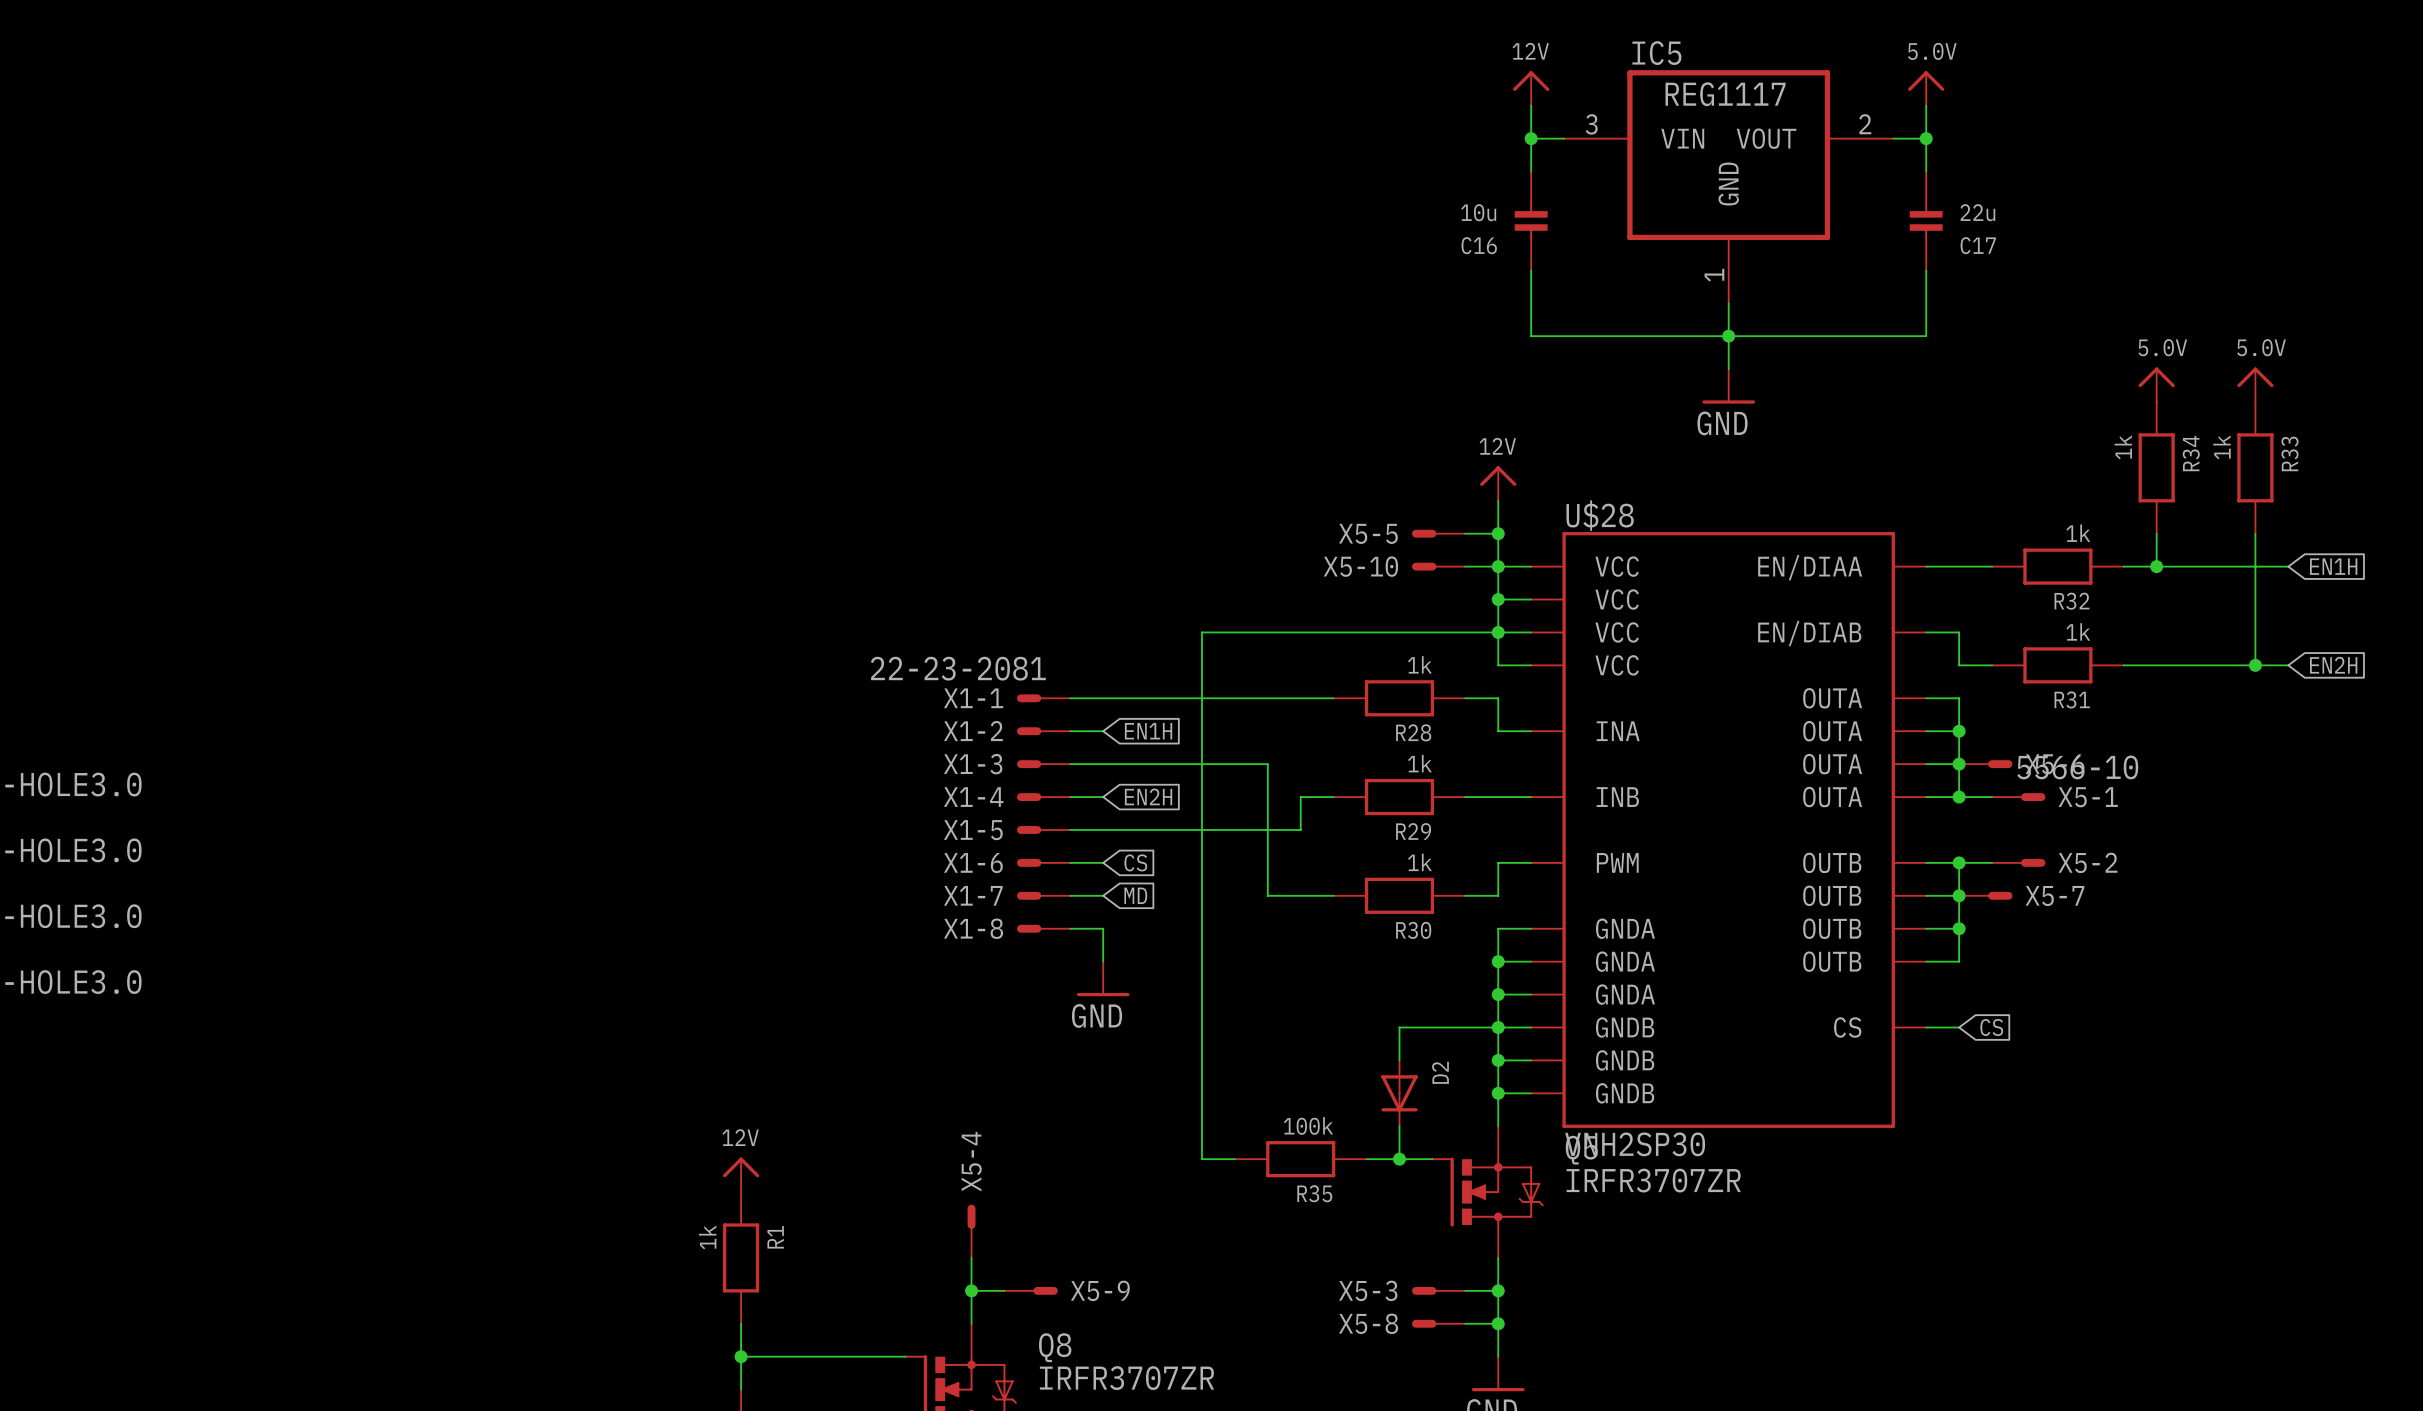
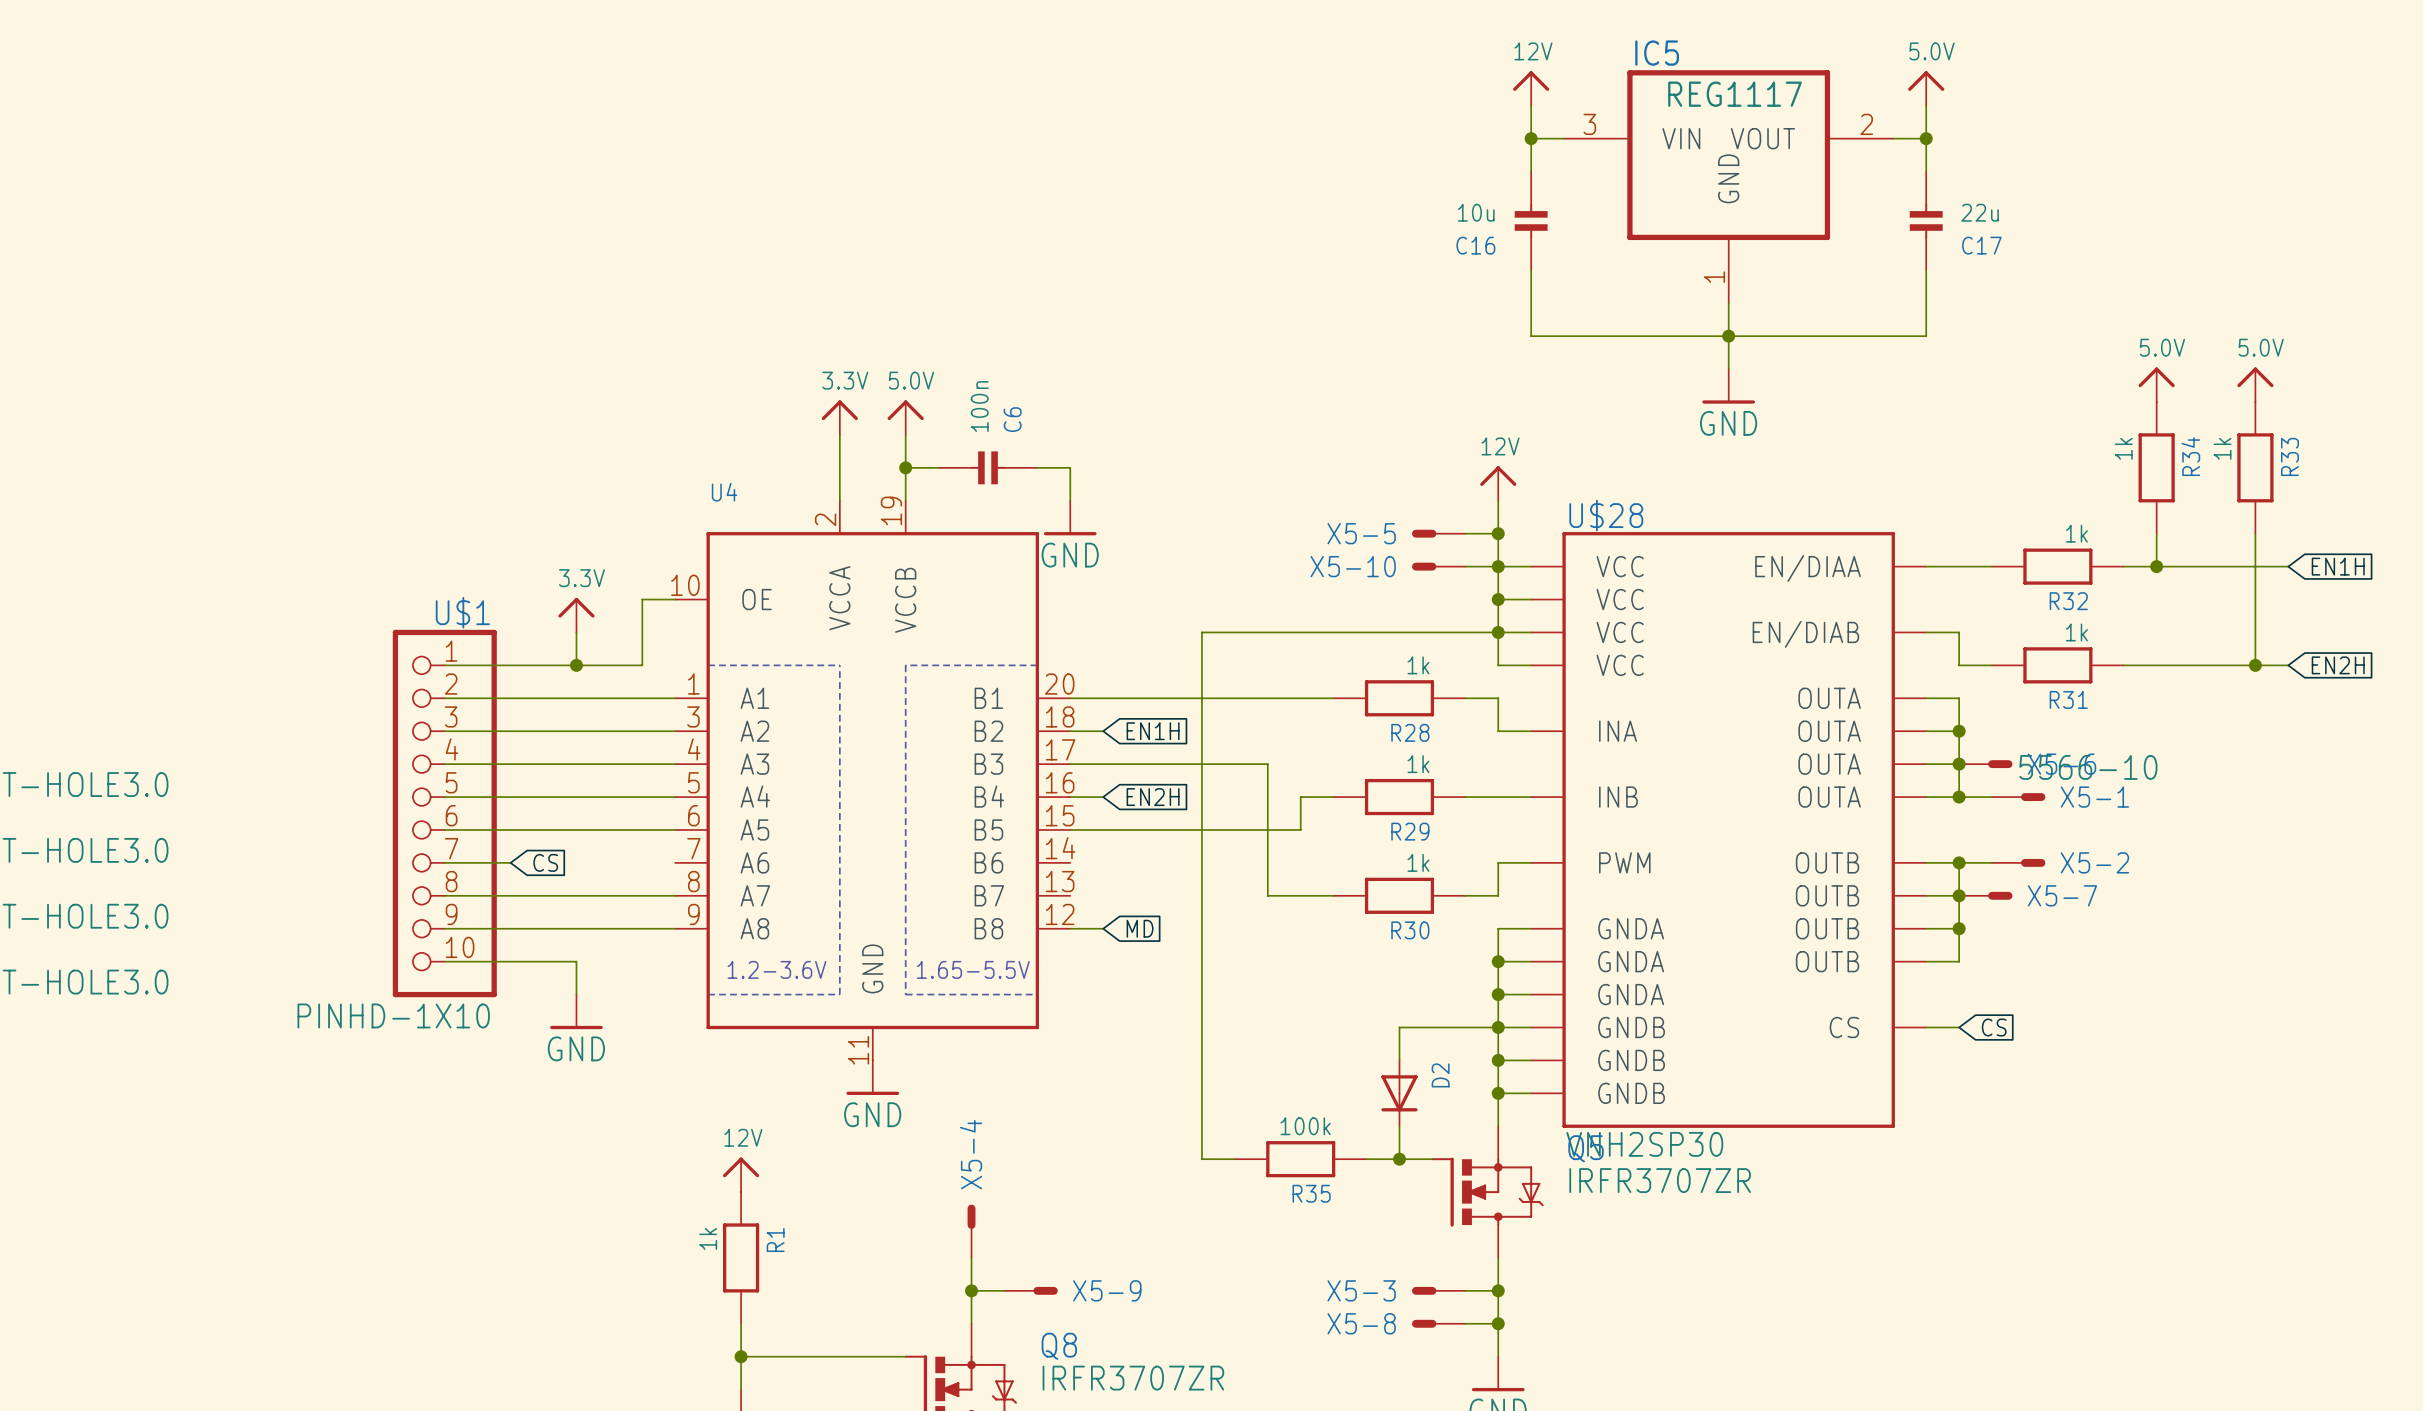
power symbol: none -> 3.3V (839, 417)
power symbol: none -> 5.0V (905, 417)
wire: none -> (839, 434) (839, 500)
wire: none -> (905, 434) (905, 500)
wire: none -> (905, 467) (938, 467)
junction: none -> (905, 467)
C6: none -> 100n (987, 467)
wire: none -> (1037, 467) (1070, 467) (1070, 500)
power symbol: none -> GND (1070, 518)
wire: none -> (675, 599) (642, 599) (642, 665) (444, 665)
power symbol: none -> 3.3V (576, 615)
wire: none -> (576, 632) (576, 665)
junction: none -> (576, 665)
wire: none -> (444, 698) (675, 698)
X1-1: 22-23-2081 (1043, 698) -> none
wire: none -> (444, 731) (675, 731)
X1-2: (1043, 731) -> none
wire: none -> (444, 764) (675, 764)
X1-3: (1043, 764) -> none
U4: none -> (872, 780)
wire: none -> (444, 797) (675, 797)
X1-4: (1043, 797) -> none
U$1: none -> PINHD-1X10 (444, 813)
wire: none -> (444, 829) (675, 829)
X1-5: (1043, 829) -> none
wire: none -> (444, 862) (510, 862)
global label: none -> CS (545, 862)
X1-6: (1043, 862) -> none
wire: (1070, 862) (1103, 862) -> none
global label: CS (1135, 862) -> none
wire: none -> (444, 895) (675, 895)
X1-7: (1043, 895) -> none
wire: (1070, 895) (1103, 895) -> none
global label position: MD (1135, 895) -> MD (1140, 928)
wire: none -> (444, 928) (675, 928)
X1-8: (1043, 928) -> none
wire: (1103, 928) (1103, 961) -> none
wire: none -> (444, 961) (576, 961) (576, 994)
power symbol: GND (1103, 978) -> none
power symbol: none -> GND (576, 1011)
power symbol: none -> GND (872, 1077)

